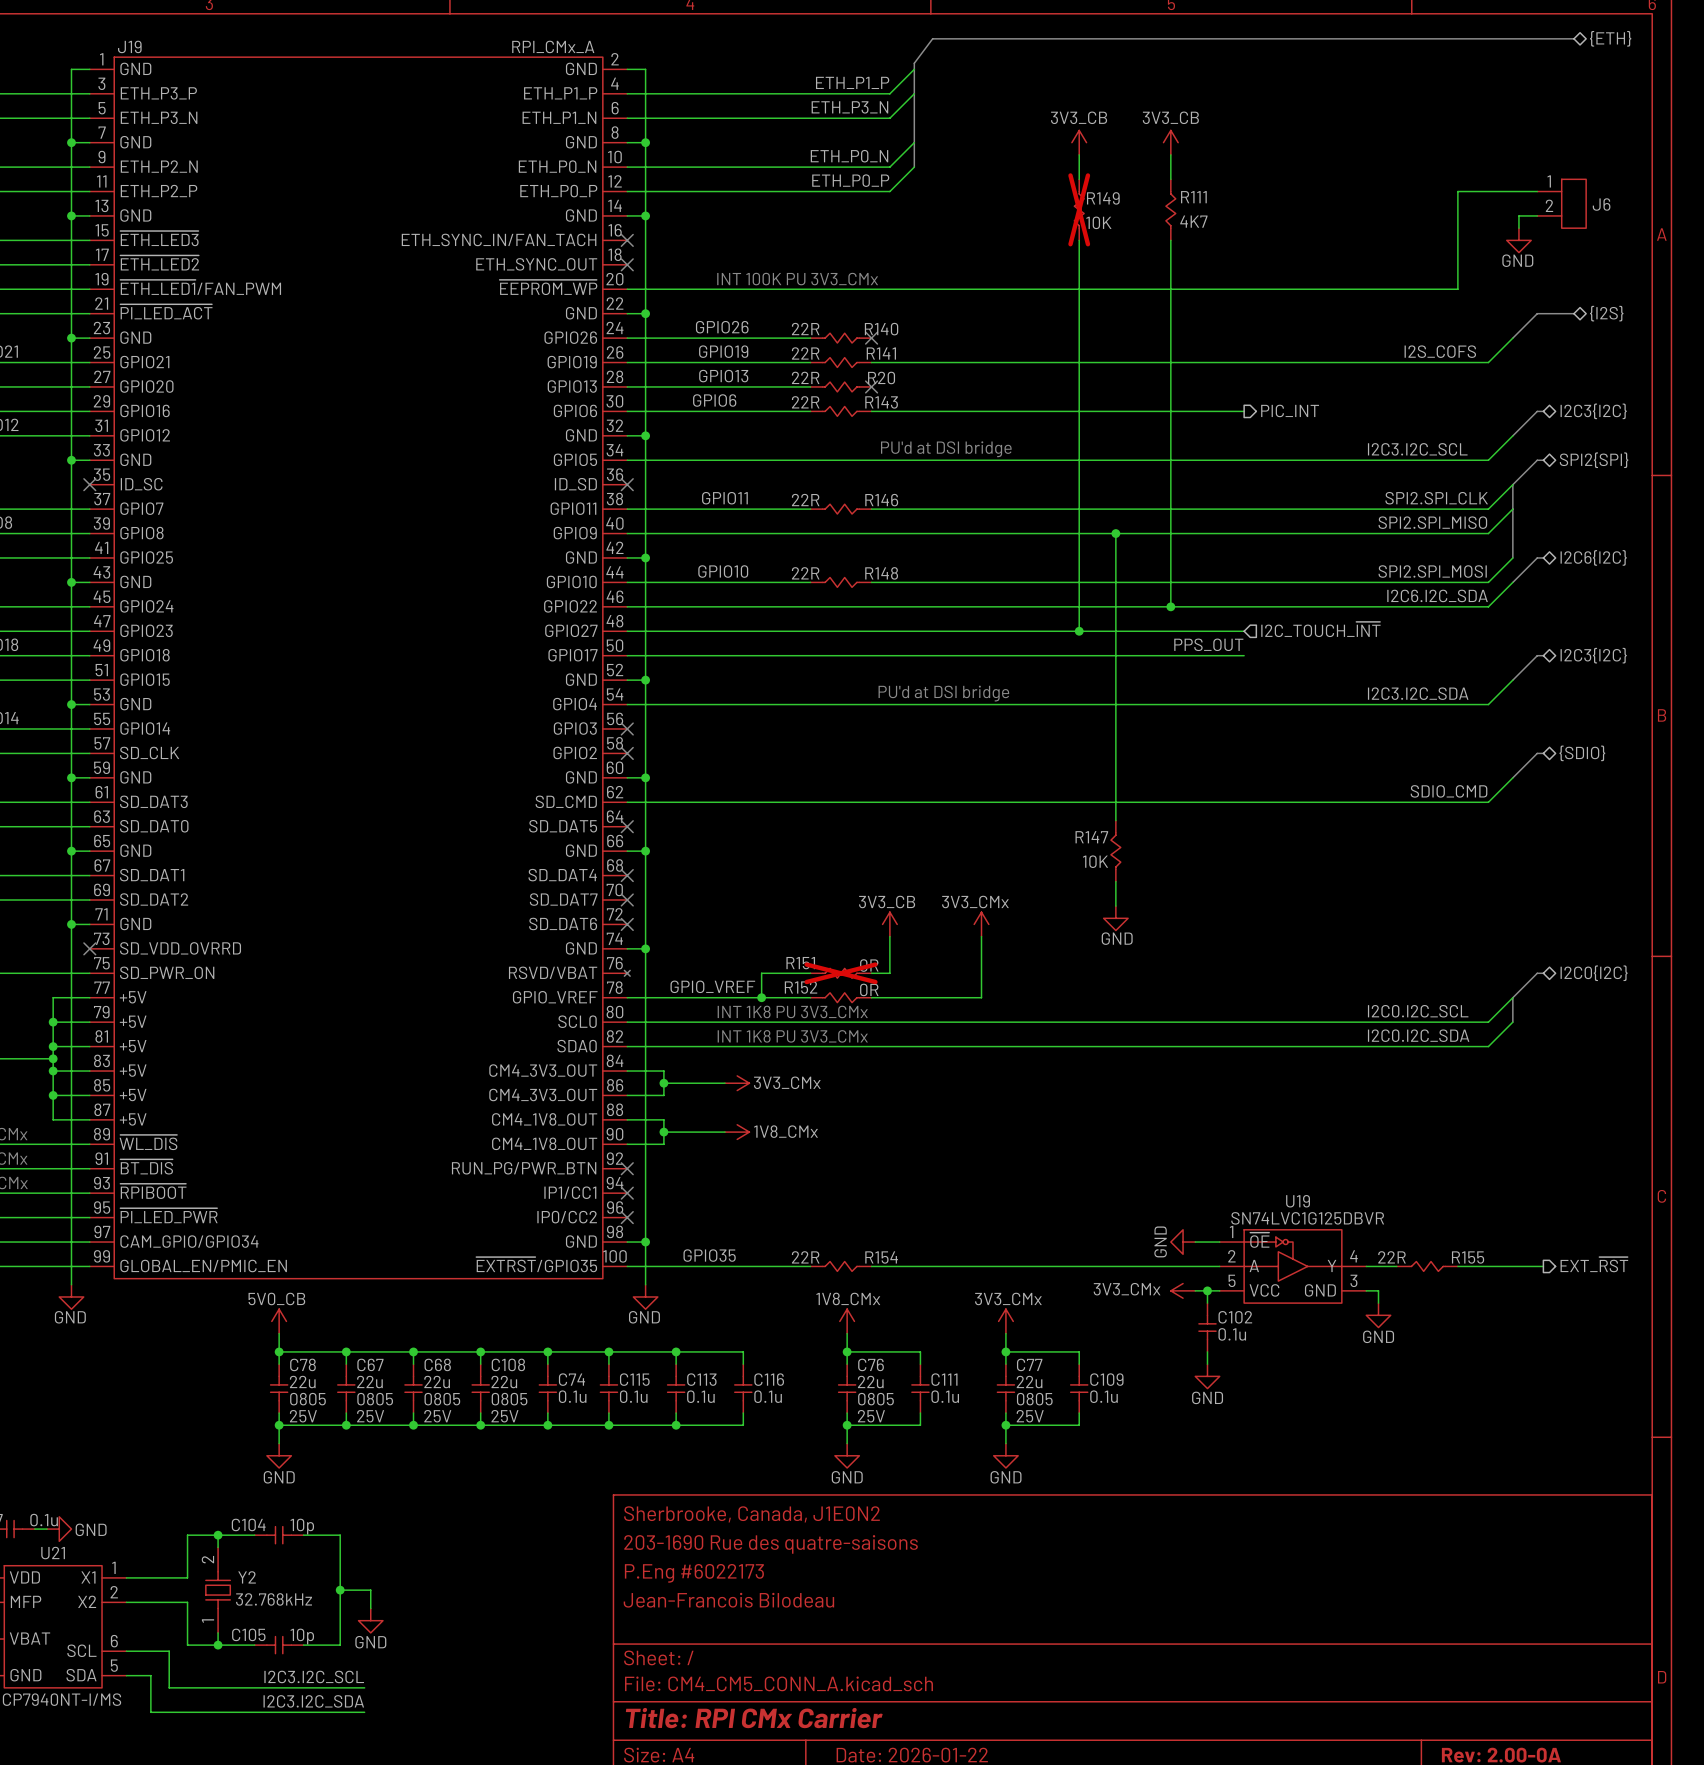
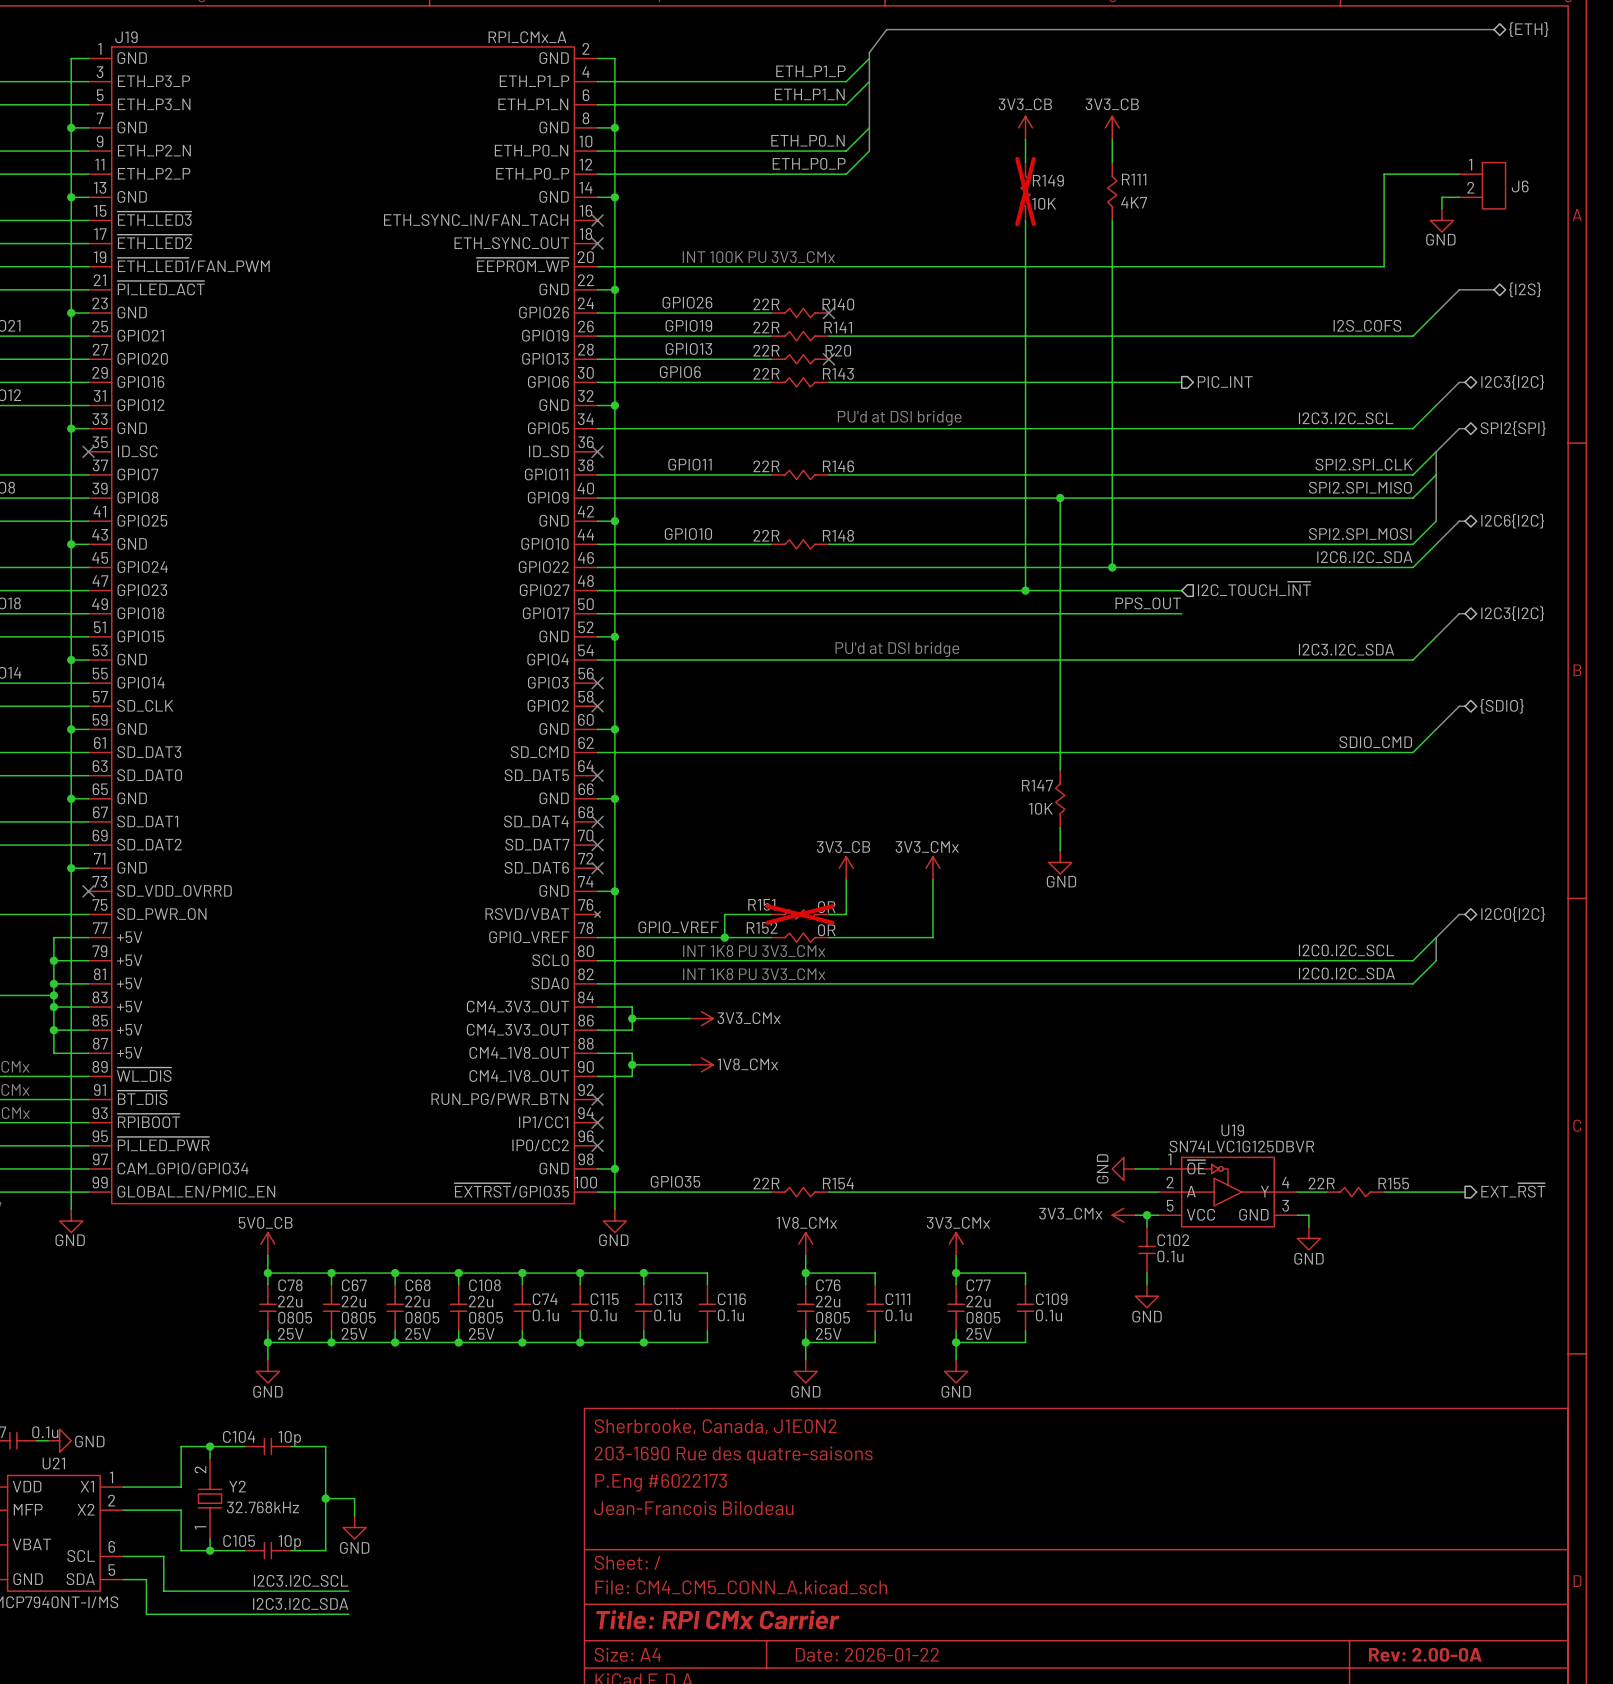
label: ETH_P3_N (849, 107) -> ETH_P1_N (809, 94)

